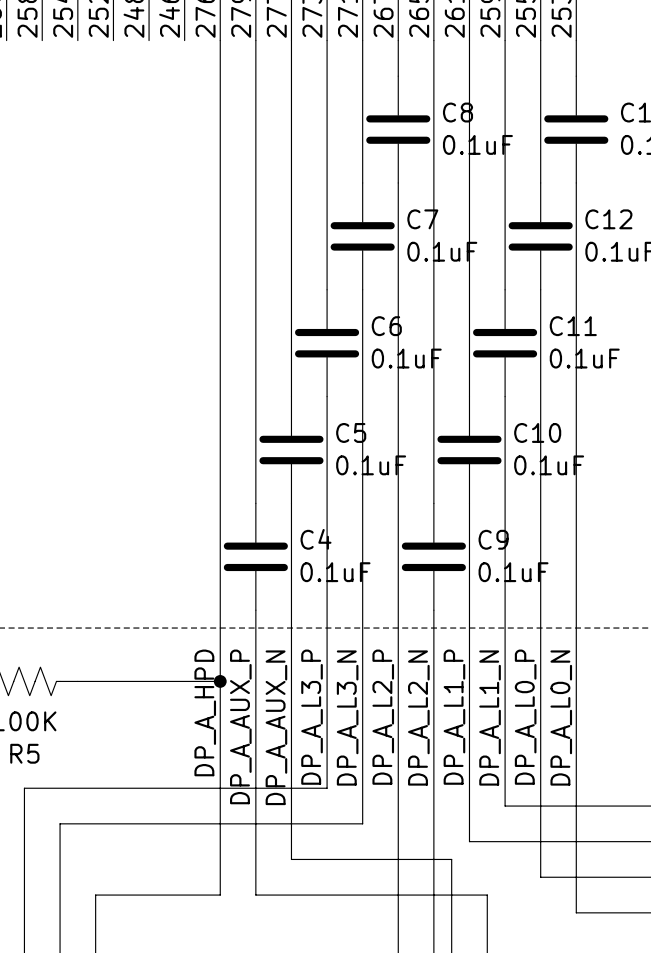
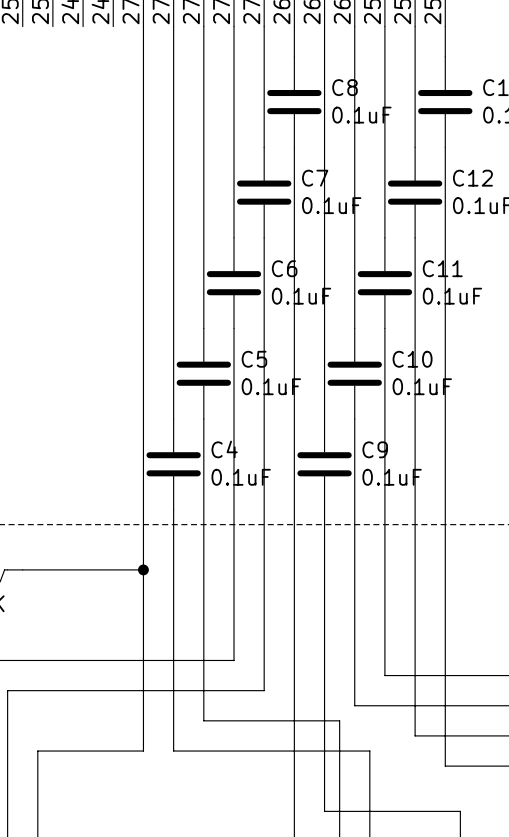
label: DP_A_HPD (205, 712) -> none
label: DP_A_L3_P (312, 717) -> none
label: DP_A_L2_P (383, 717) -> none
label: DP_A_L1_P (454, 717) -> none
label: DP_A_L0_P (525, 717) -> none
label: DP_A_L3_N (347, 718) -> none
label: DP_A_L2_N (418, 718) -> none
label: DP_A_L1_N (490, 718) -> none
label: DP_A_L0_N (561, 718) -> none
label: DP_A_AUX_P (240, 726) -> none
label: DP_A_AUX_N (276, 727) -> none

